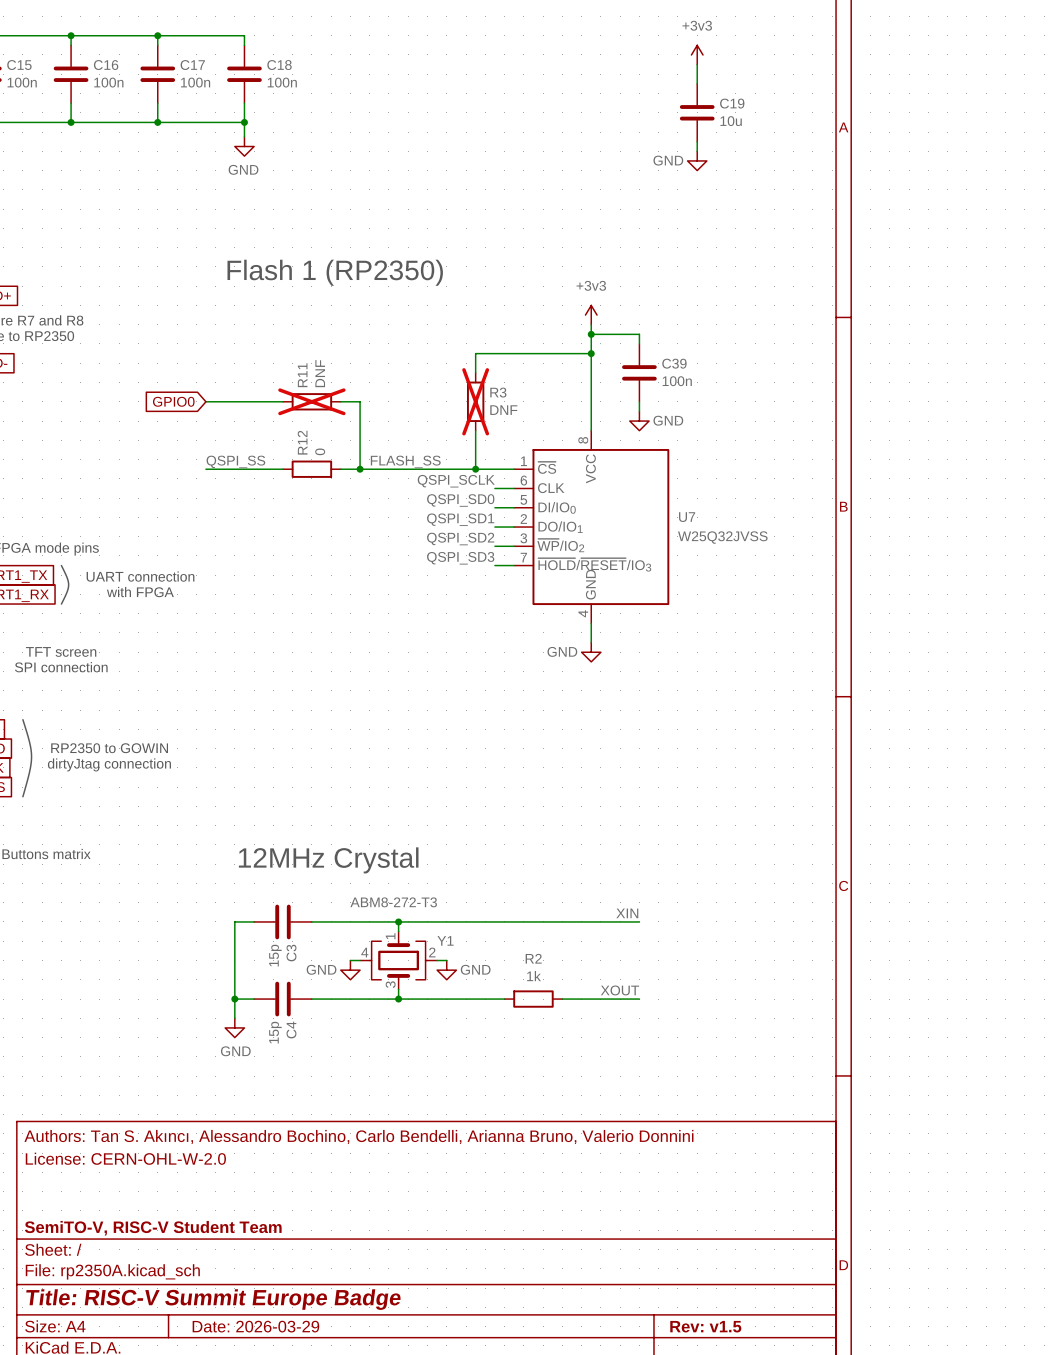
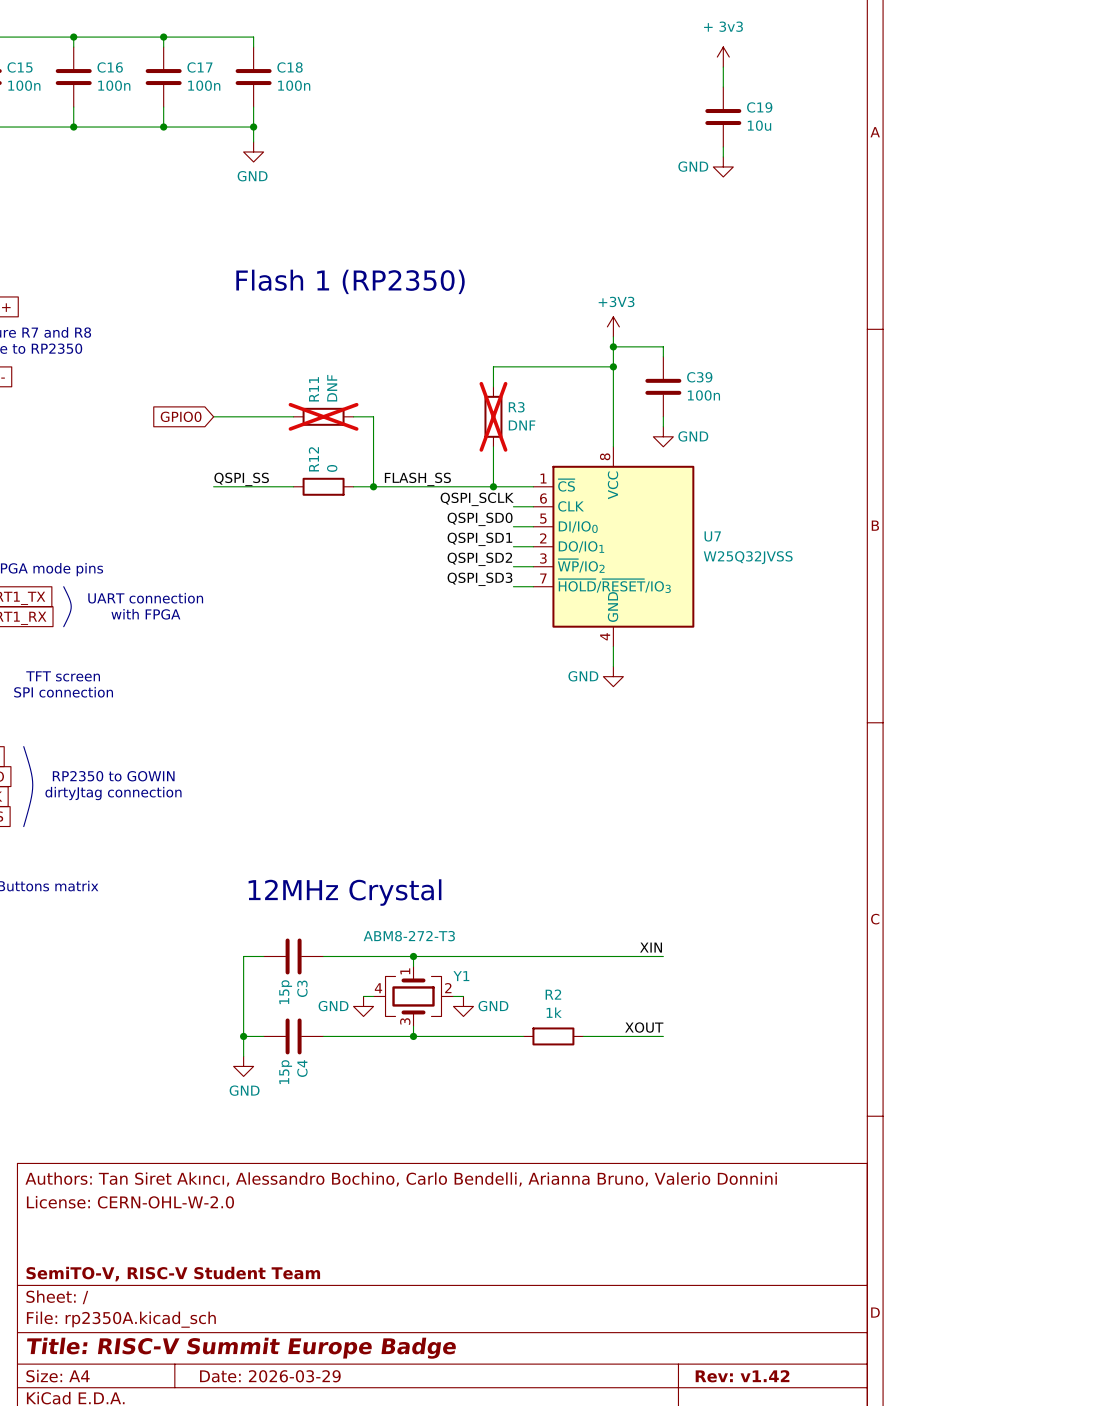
power symbol: +3v3 (697, 54) -> + 3v3 (723, 57)
power symbol: +3v3 (591, 315) -> +3V3 (613, 326)
title block: Authors: Tan S. Akıncı, Alessandro Bochino, Carlo Bendelli, Arianna Bruno, Valerio Donnini (358, 1136) -> Authors: Tan Siret Akıncı, Alessandro Bochino, Carlo Bendelli, Arianna Bruno, Valerio Donnini (401, 1179)
title block: Rev: v1.5 (705, 1326) -> Rev: v1.42 (742, 1376)

